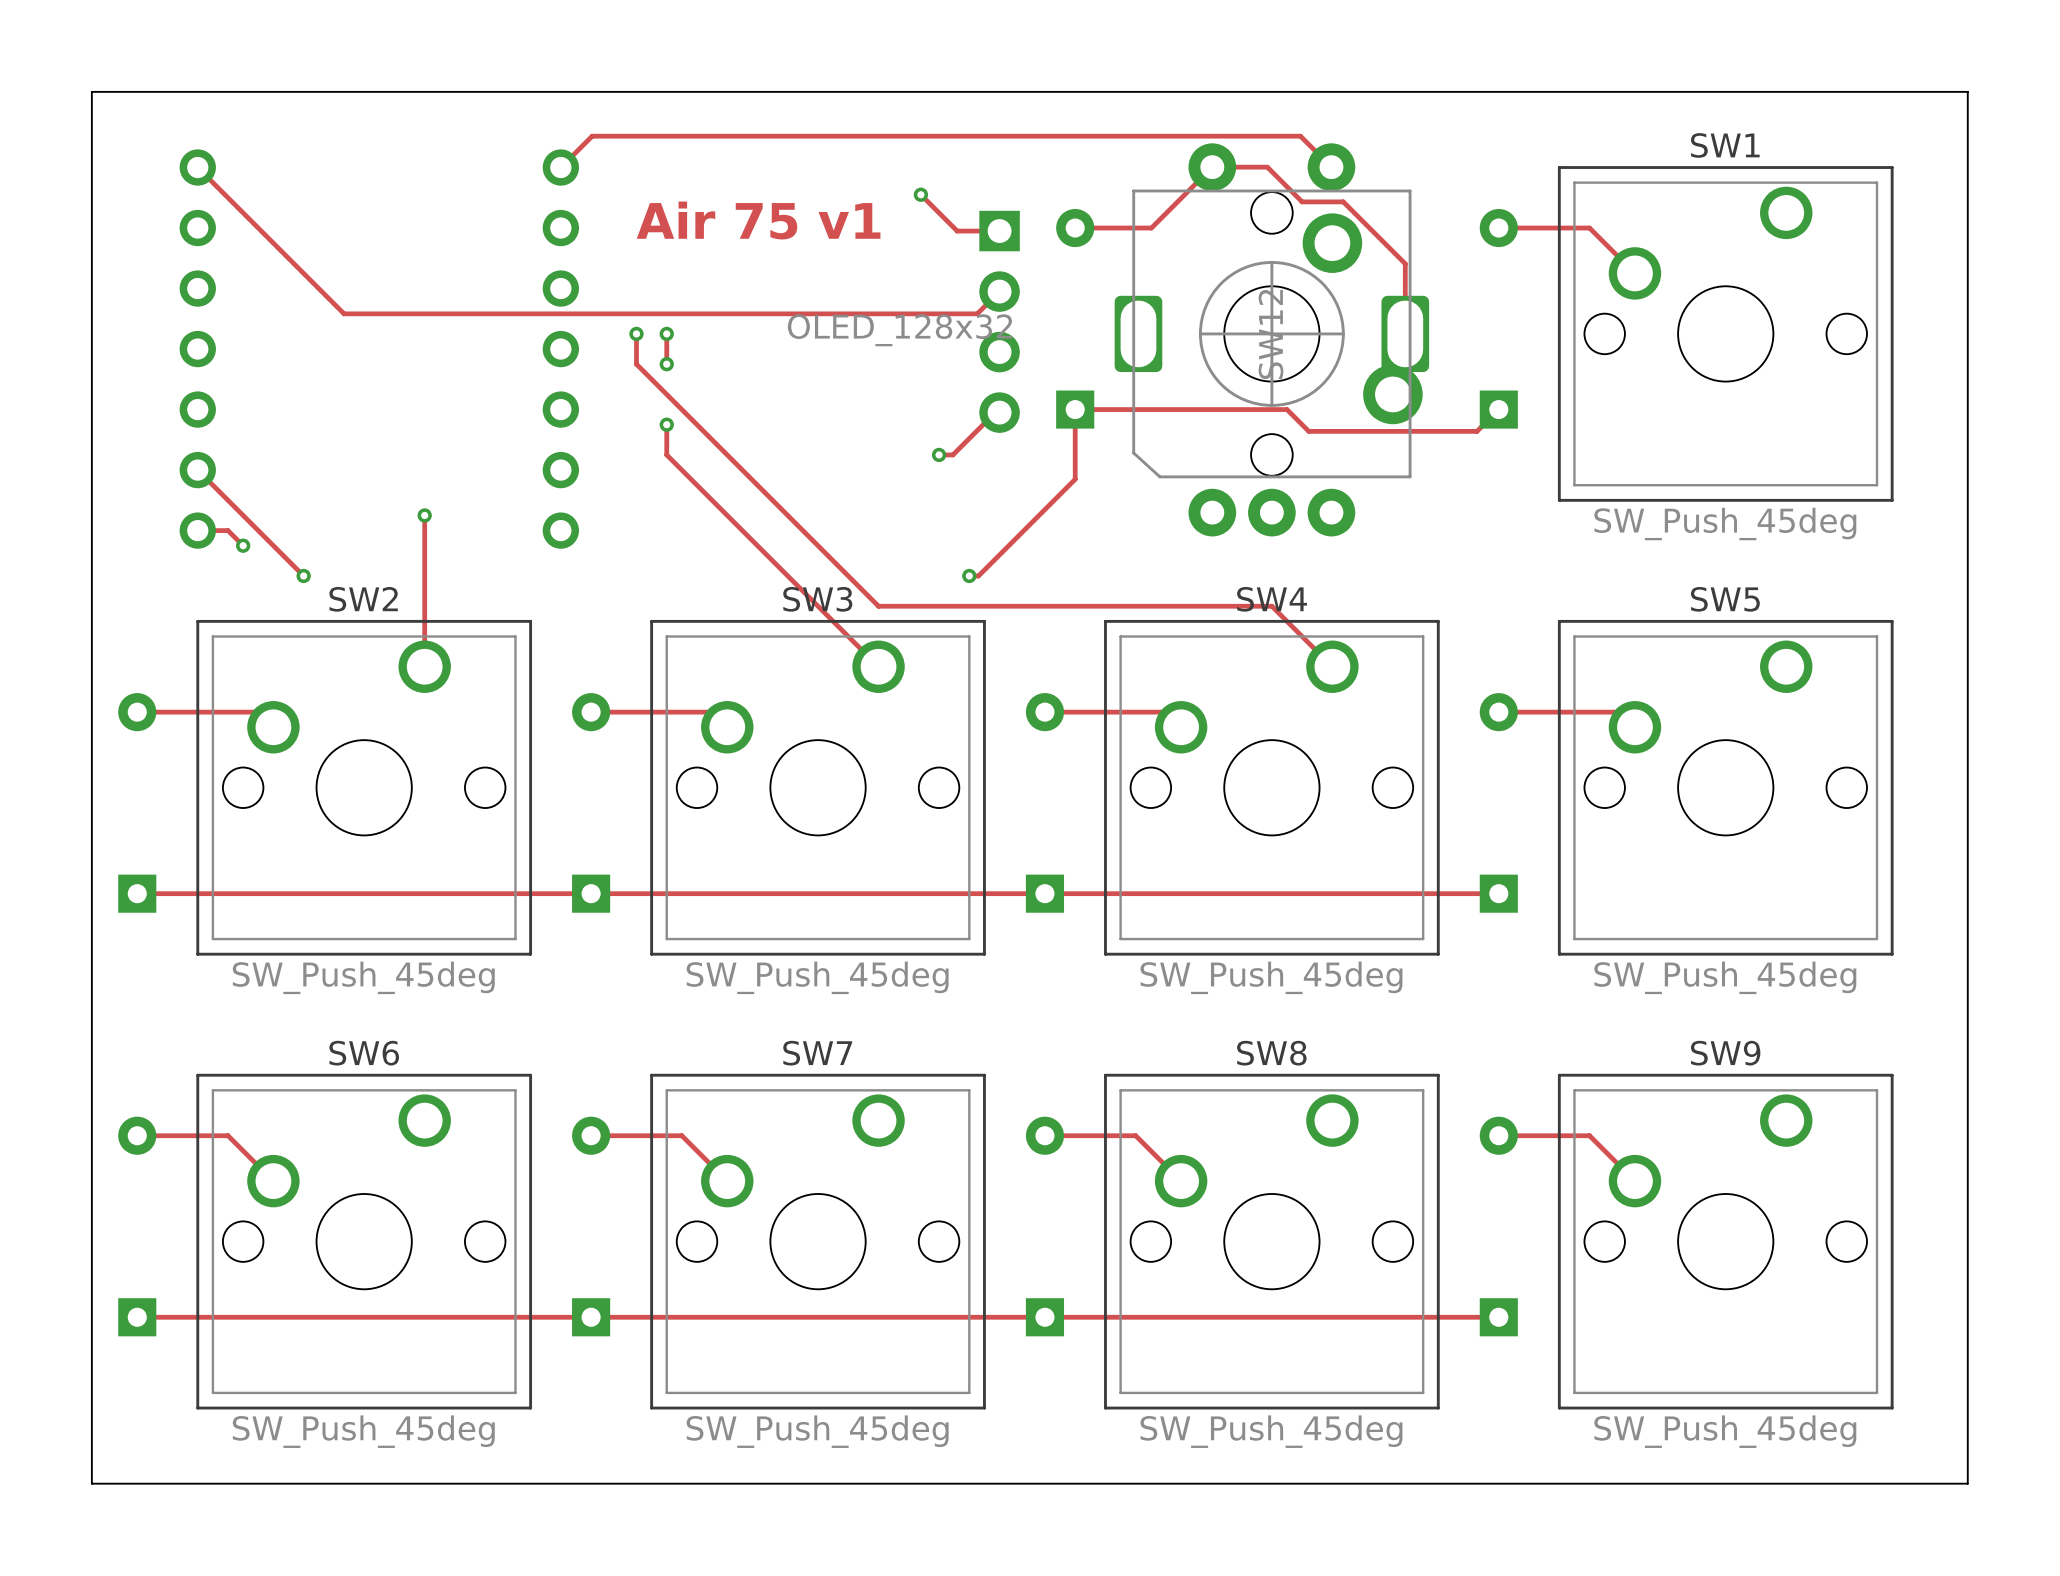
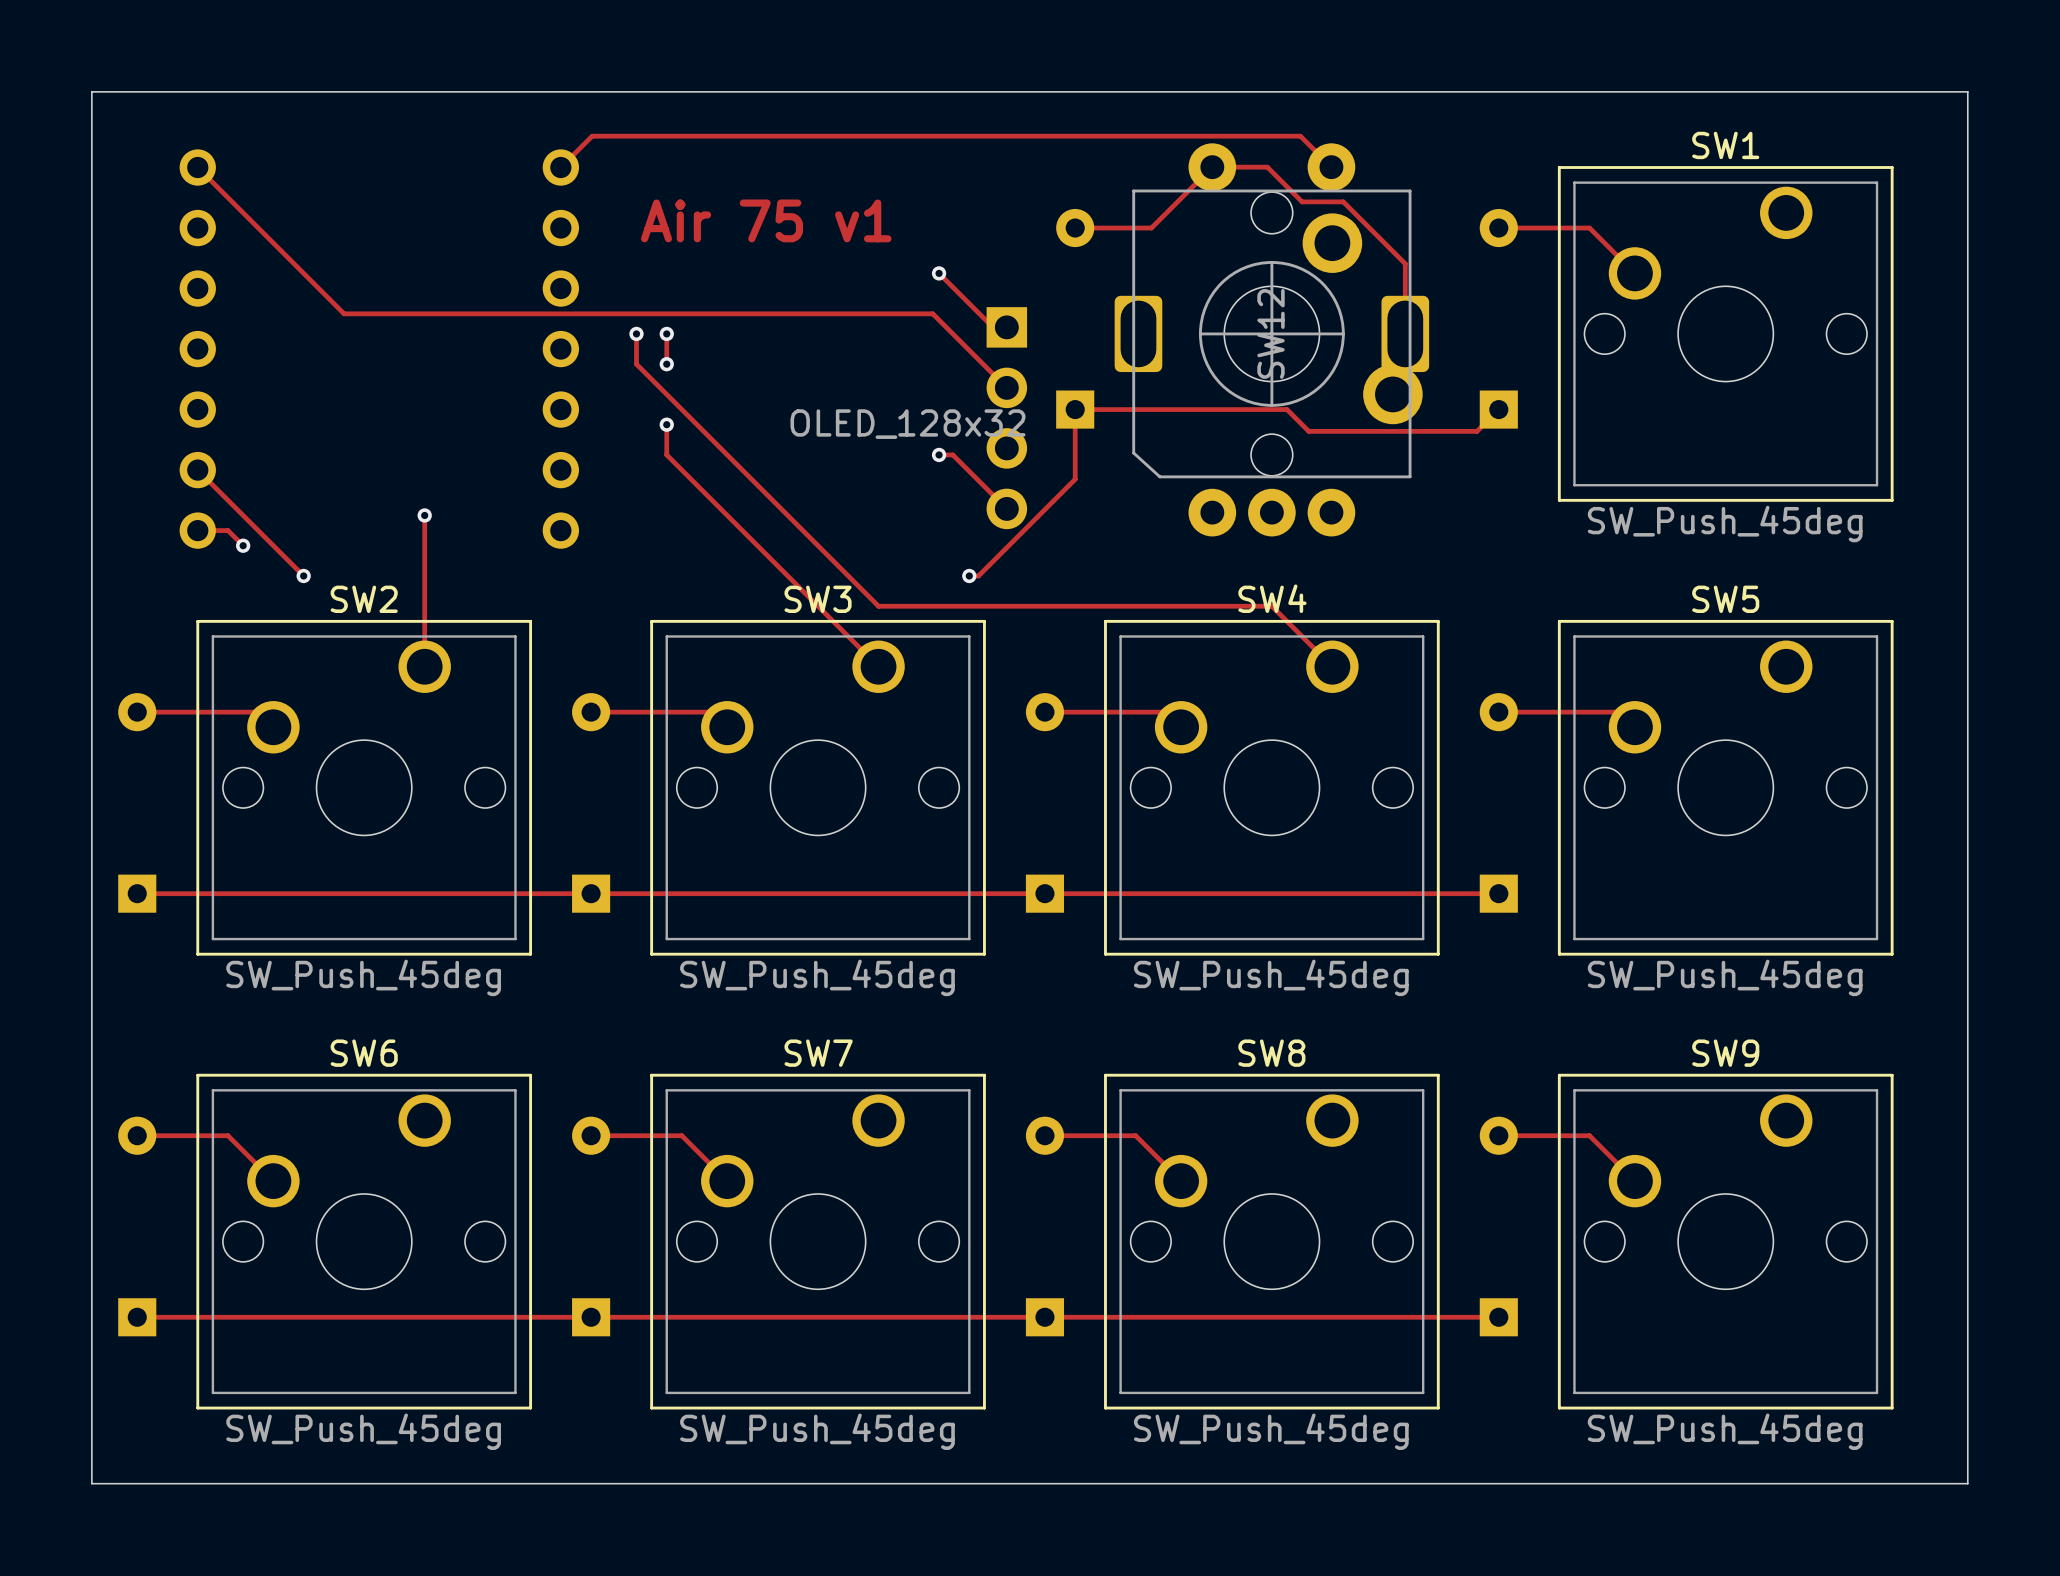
track: (920, 194) (957, 231) (999, 231) -> none
via position: (920, 194) -> (939, 273)
track: none -> (939, 273) (993, 327) (1006, 327)
track: (999, 291) (977, 313) (932, 313) -> (1006, 387) (932, 313)
part position: (999, 321) -> (1006, 418)
track: (999, 412) (995, 412) (952, 454) -> (1006, 508) (952, 454)

